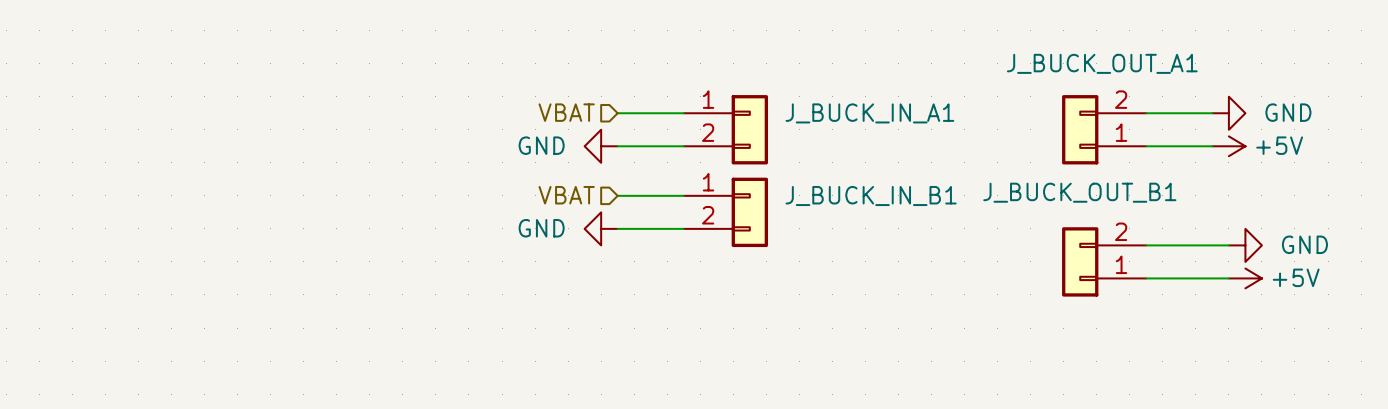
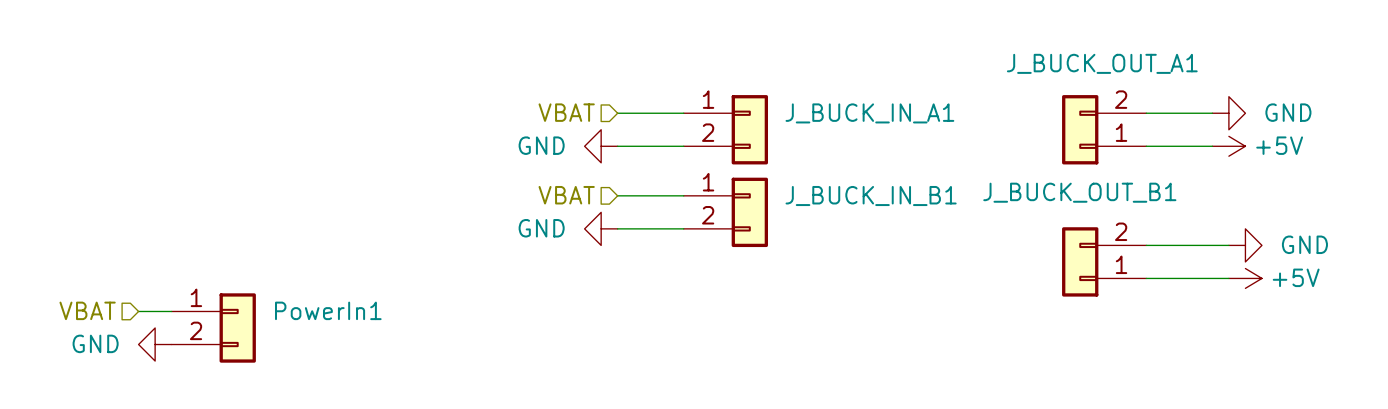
hierarchical label: none -> VBAT (87, 310)
wire: none -> (138, 311) (171, 311)
PowerIn1: none -> (213, 328)
power symbol: none -> GND (155, 344)

